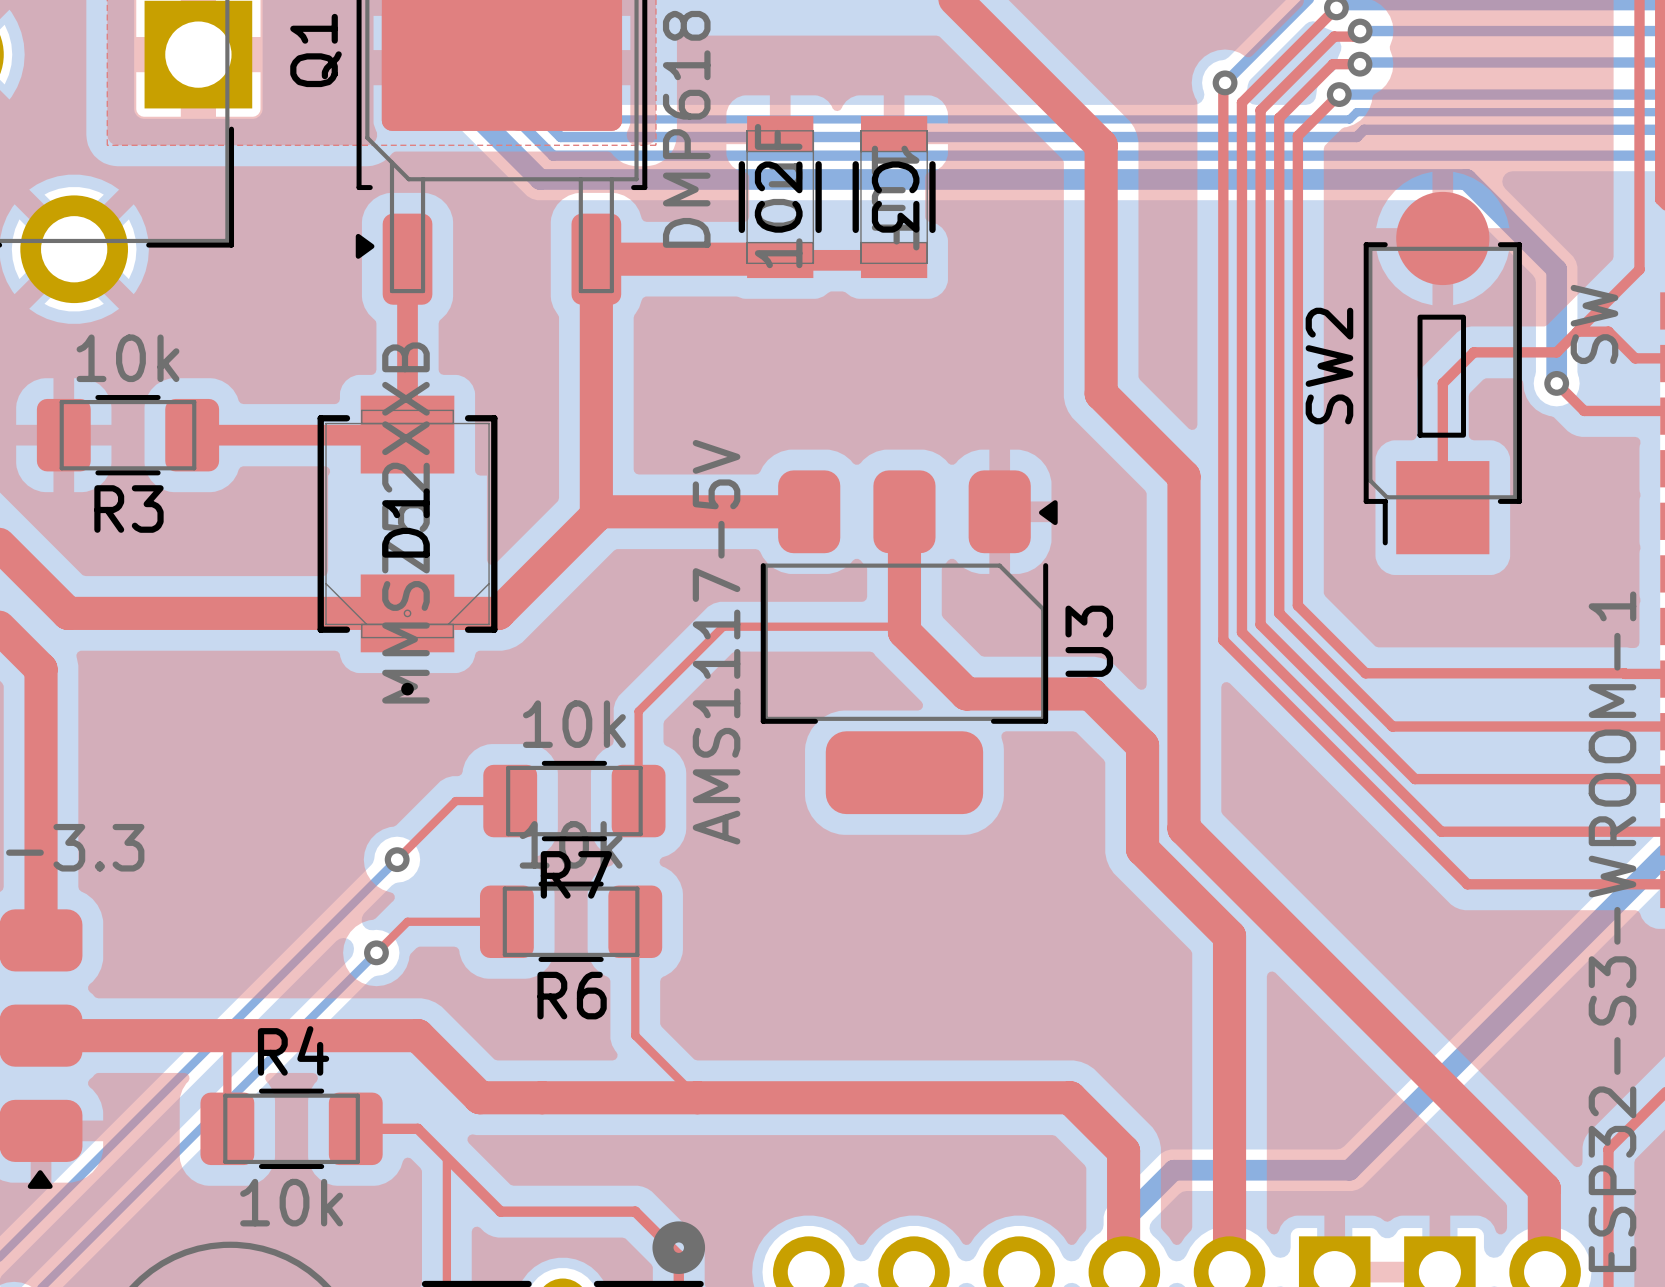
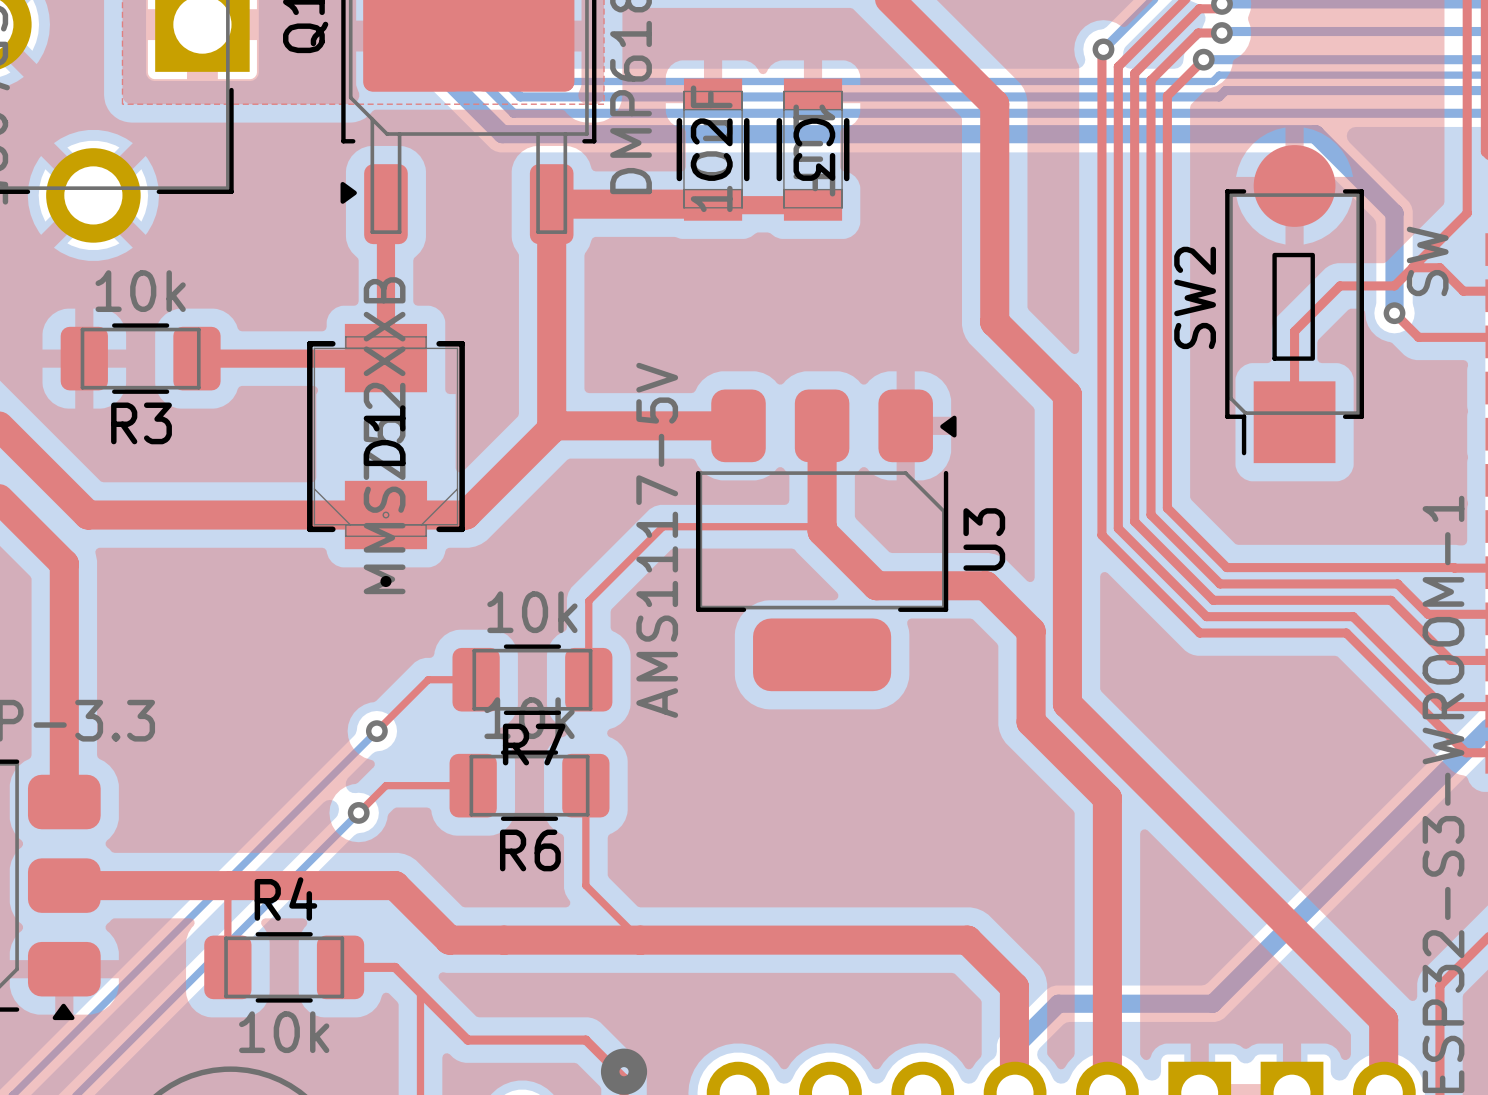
top track: (1494, 352) (1473, 352) (1442, 383) (1442, 404) -> (1340, 285) (1294, 331)
top track: (1260, 620) (1260, 624) (1414, 779) (1621, 779) -> (1134, 521) (1213, 600) (1390, 600) (1451, 660)
top track: (1241, 628) (1241, 632) (1441, 831) (1612, 831) -> (1118, 528) (1206, 616) (1353, 616) (1443, 706)
top track: (1223, 636) (1223, 640) (1467, 884) (1638, 884) -> (1101, 535) (1199, 633) (1346, 633) (1466, 752)
top track: (1357, 691) (1392, 726) (1594, 726) -> (1220, 583) (1397, 583) (1428, 614)

